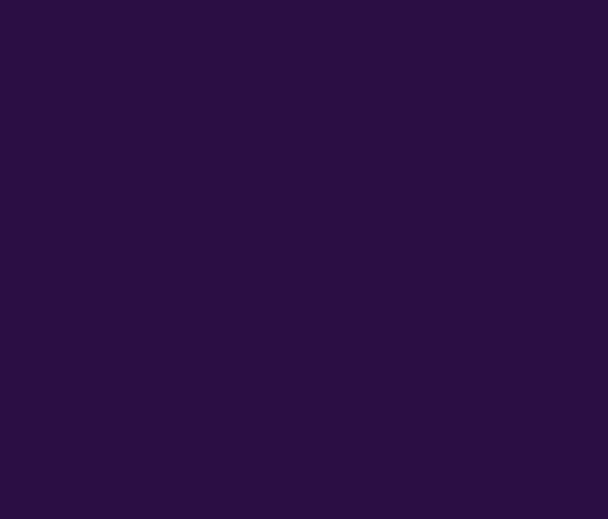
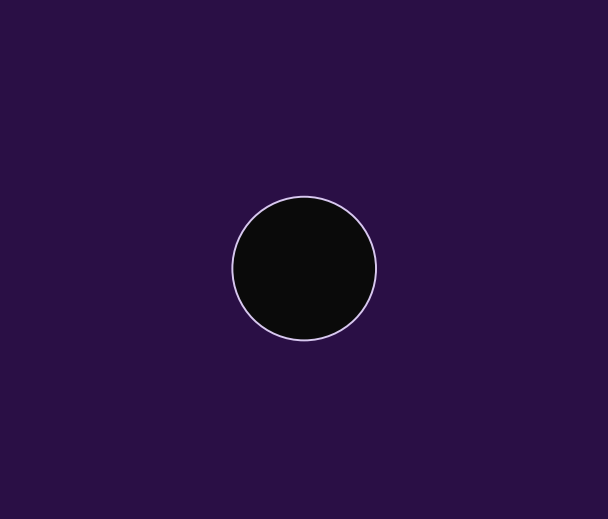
part: none -> (304, 268)

